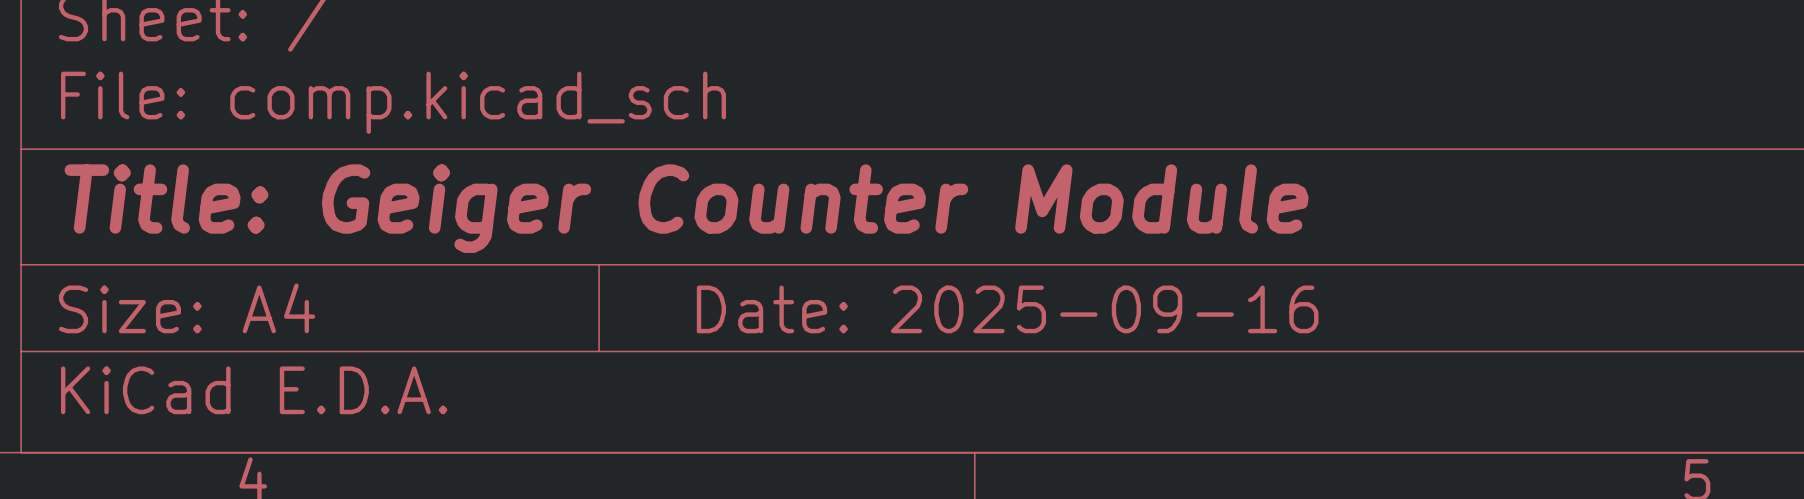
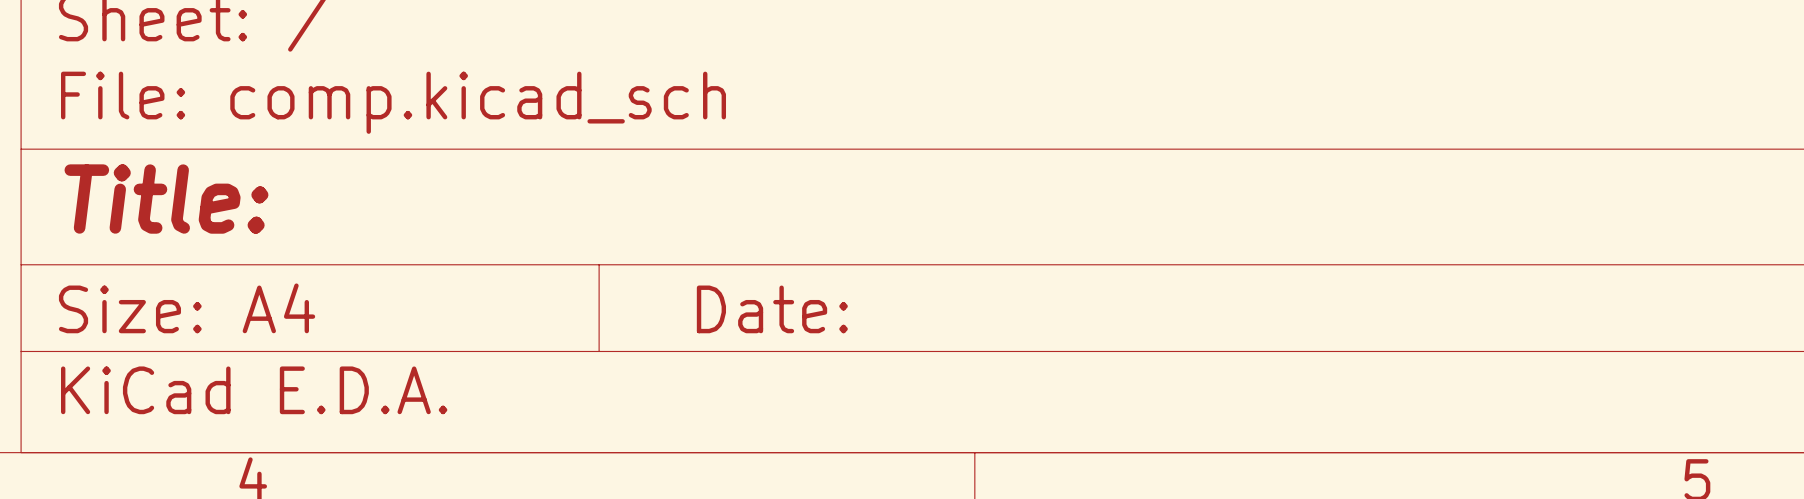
title block: Title: Geiger Counter Module (686, 208) -> Title: (166, 199)
title block: Date: 2025-09-16 (1007, 309) -> Date: (772, 309)

